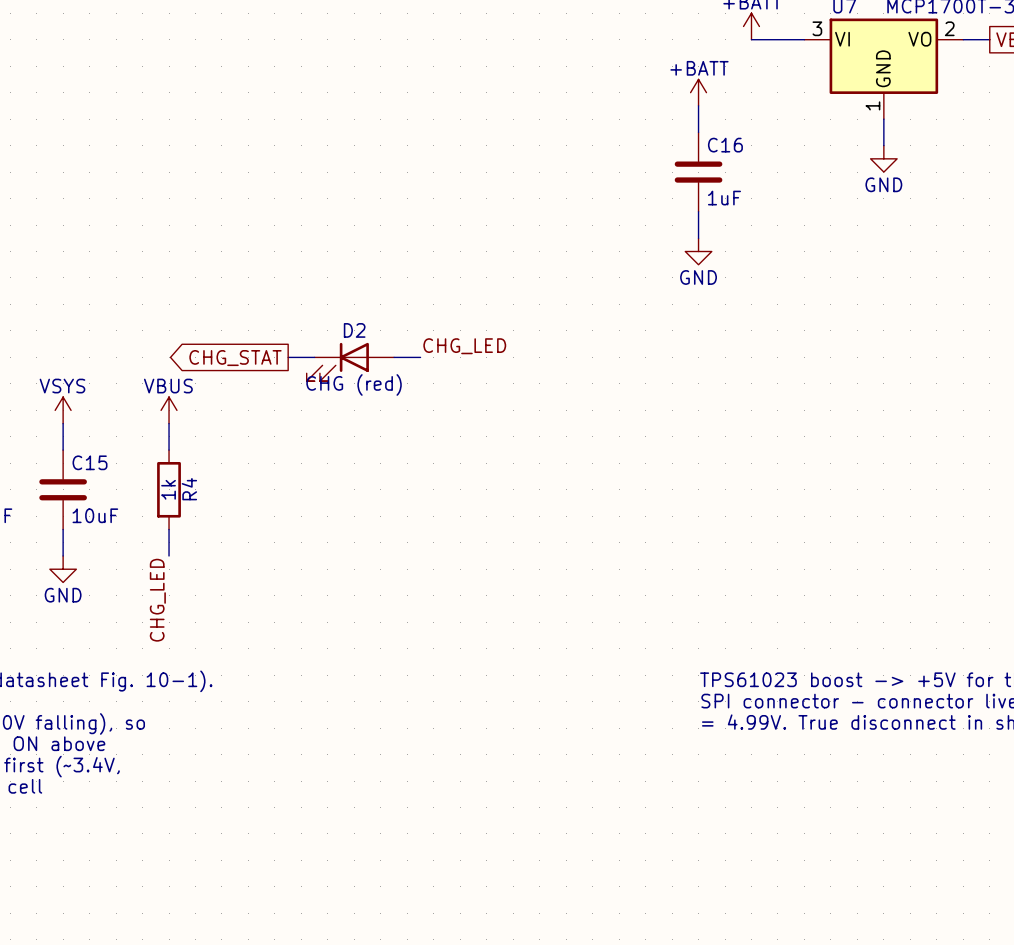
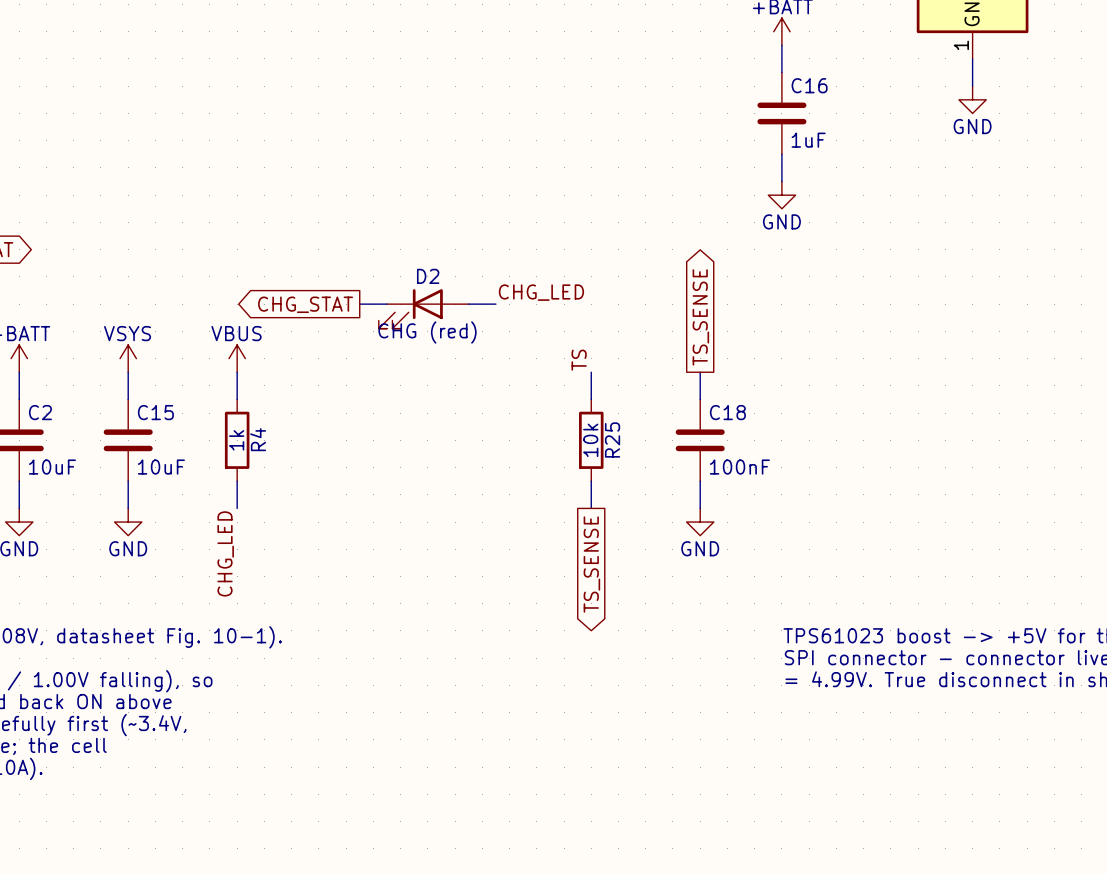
global label: none -> TS_SENSE (700, 317)
label: none -> TS (579, 360)
wire: none -> (591, 372) (591, 399)
wire: none -> (700, 372) (700, 399)
R25: none -> 10k (591, 440)
C18: none -> 100nF (700, 440)
wire: none -> (591, 481) (591, 508)
wire: none -> (700, 481) (700, 508)
power symbol: none -> GND (700, 522)
global label: none -> TS_SENSE (591, 564)

